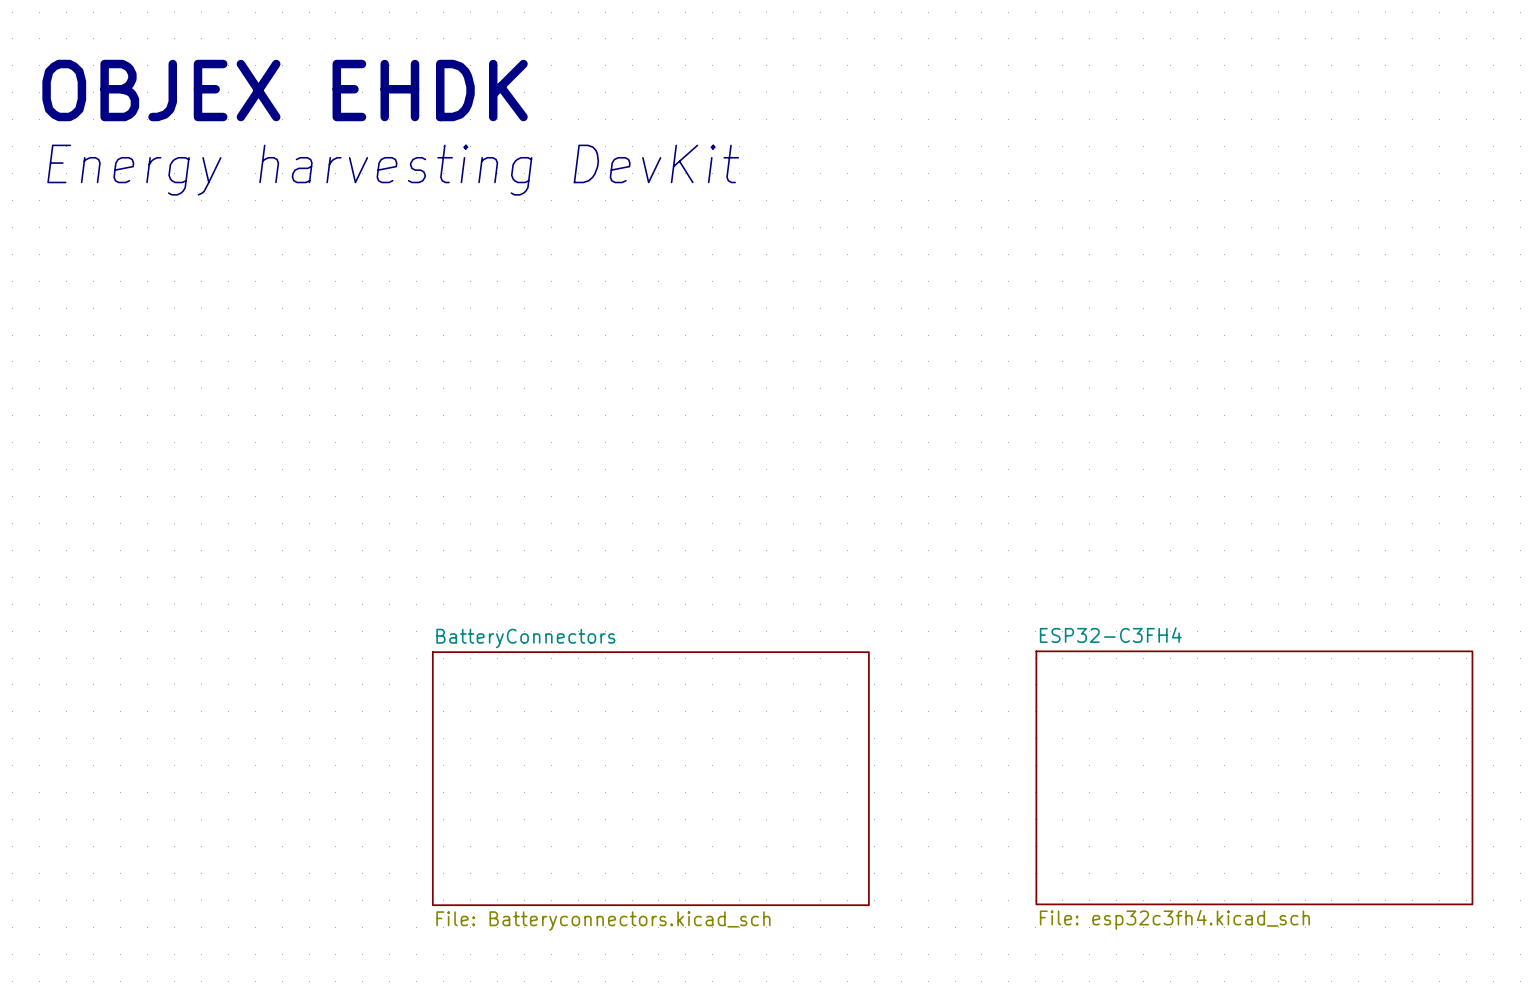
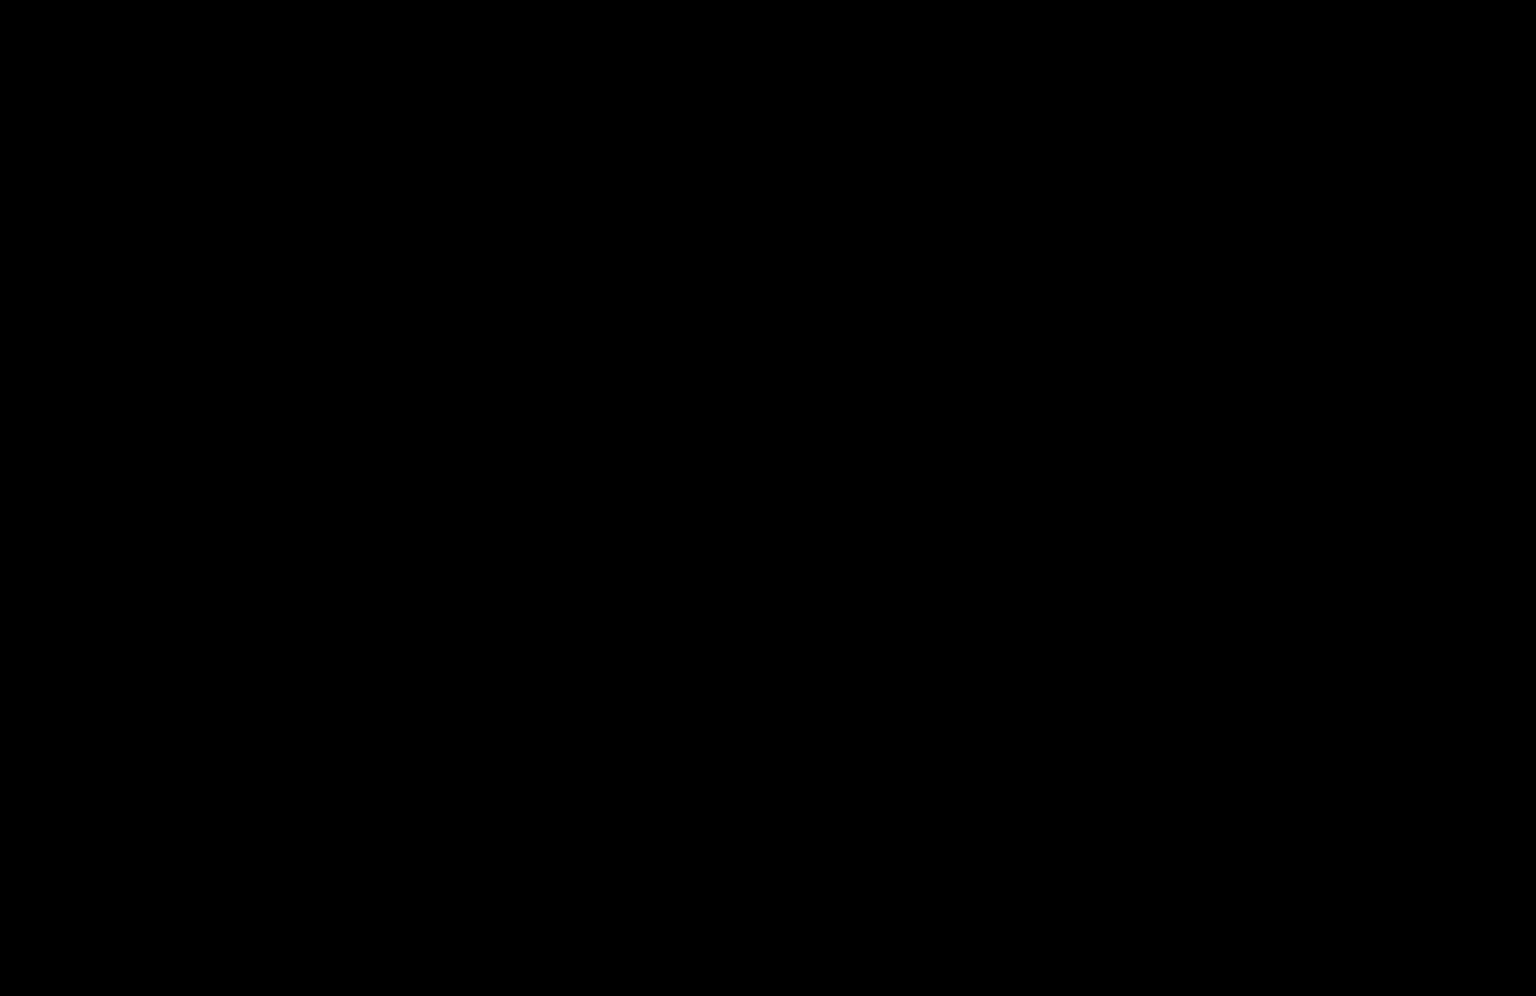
text: OBJEX EHDK (285, 90) -> none
text: Energy harvesting DevKit (393, 170) -> none
sheet ESP32-C3FH4: File: esp32c3fh4.kicad_sch (1254, 777) -> none
sheet BatteryConnectors: File: Batteryconnectors.kicad_sch (650, 778) -> none

